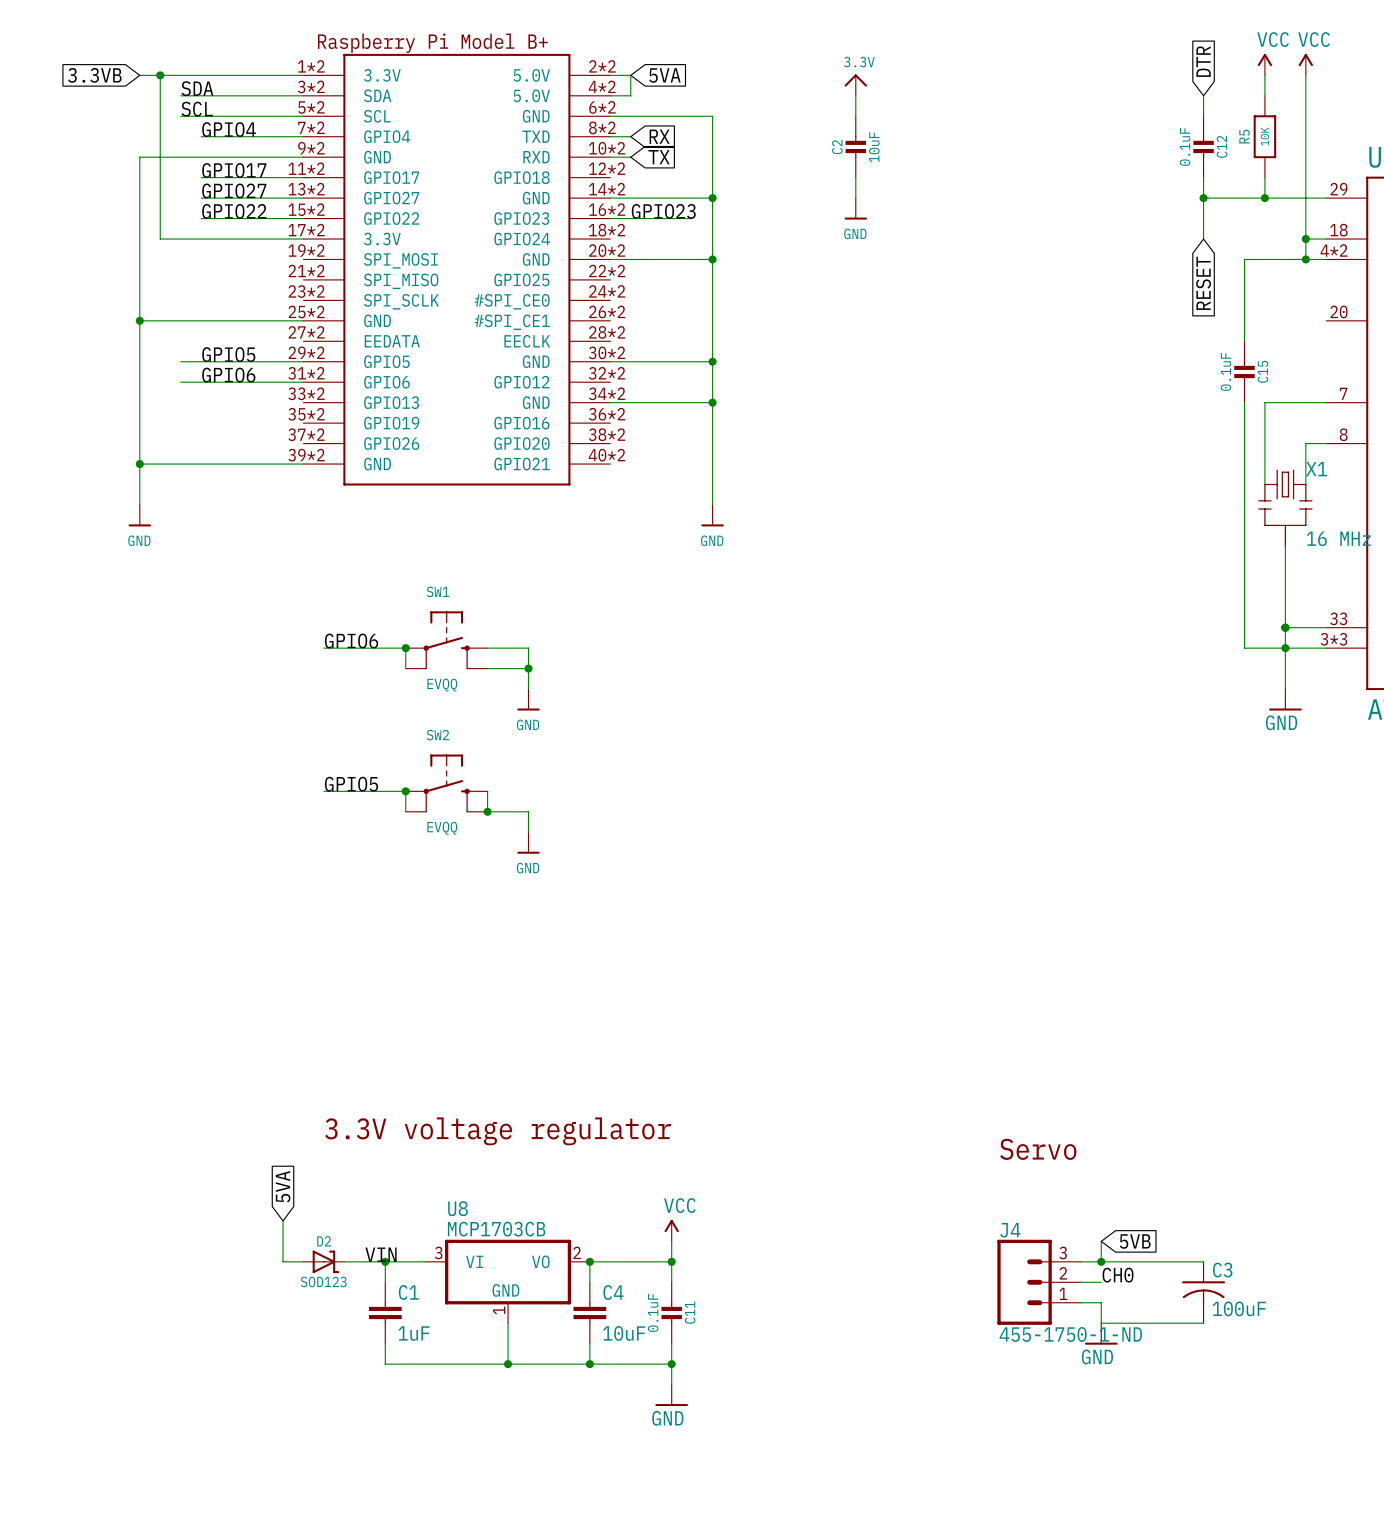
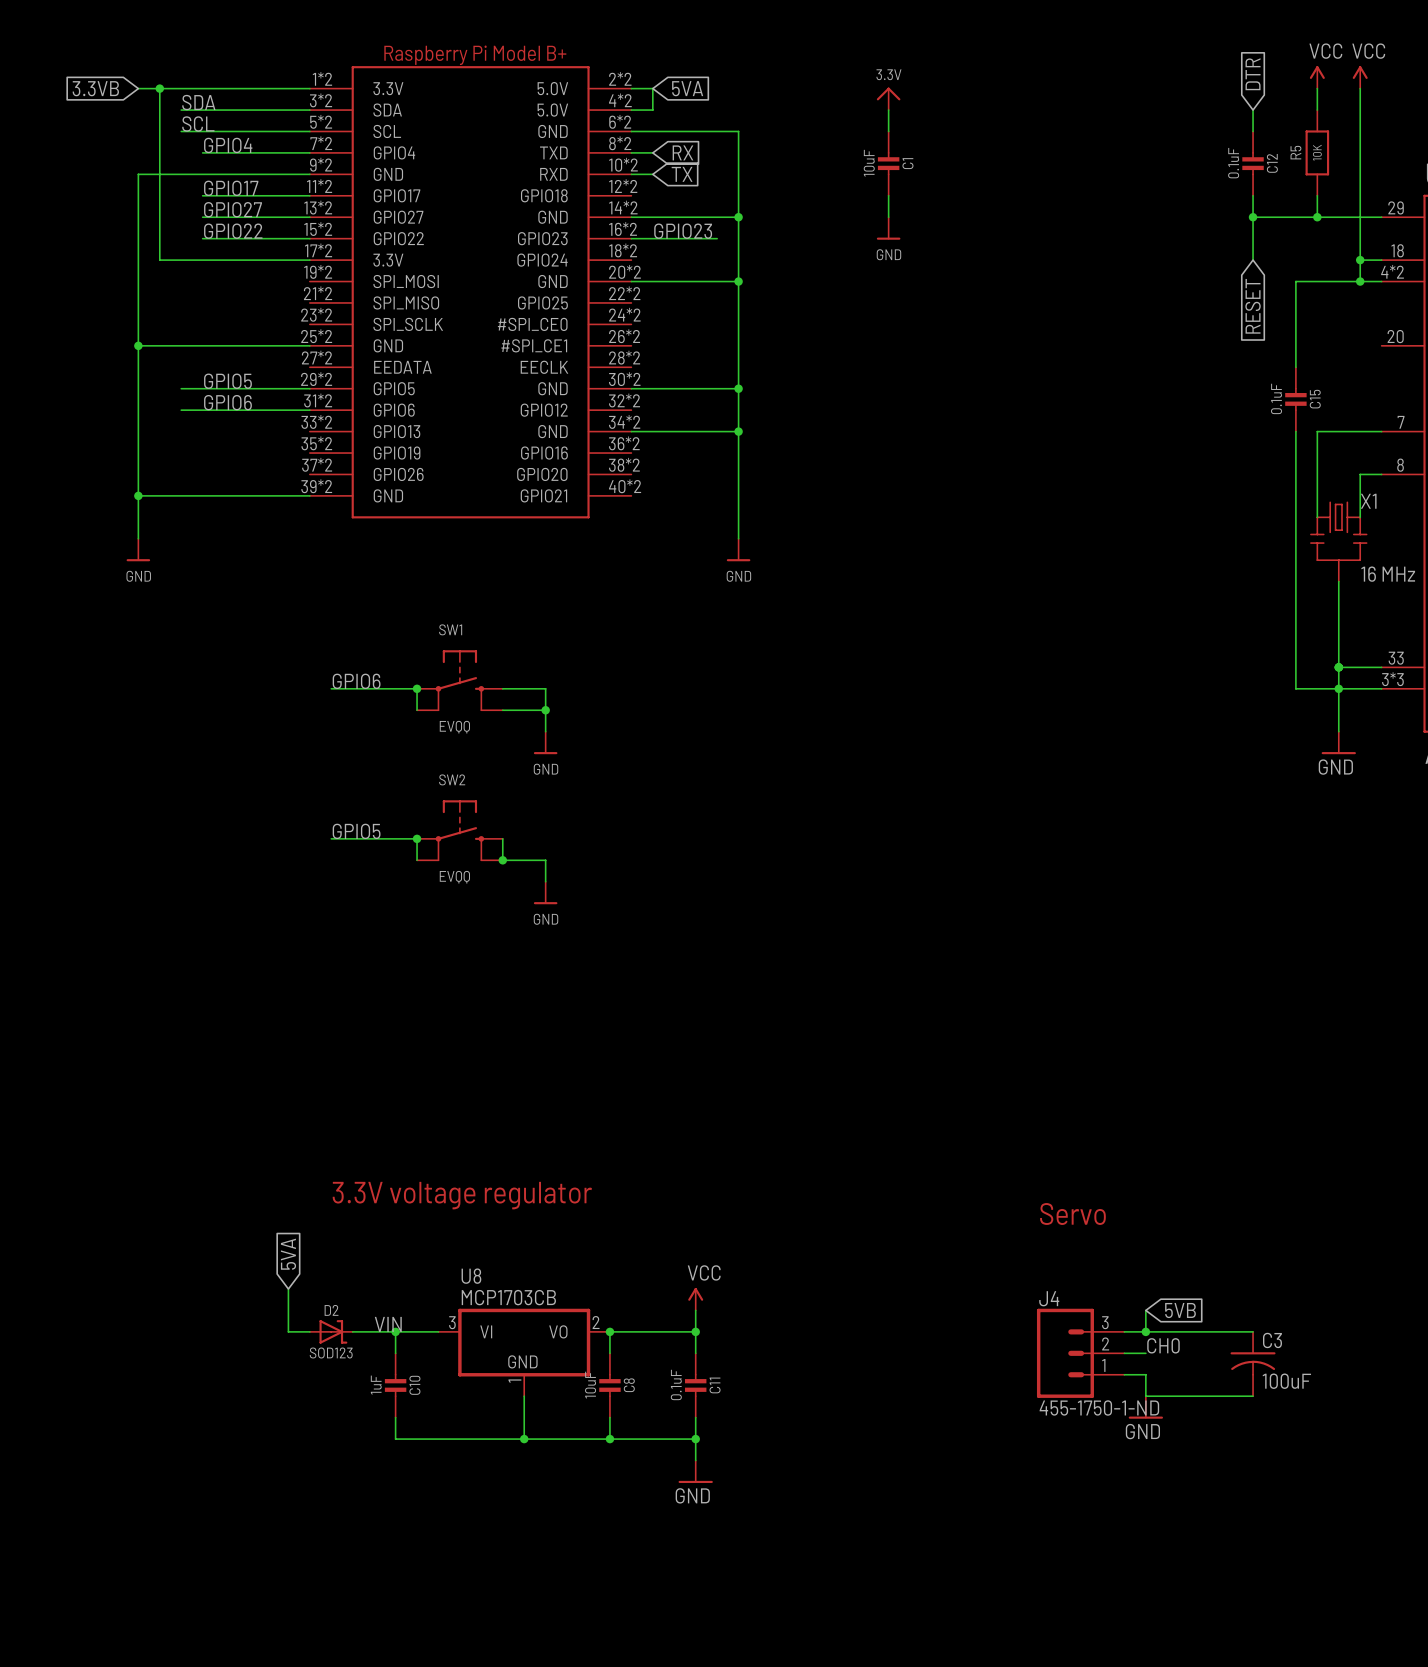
C2 name: C2 (837, 147) -> C1 (907, 163)
C2 value position: 10uF (874, 147) -> 10uF (869, 163)
C1: 1uF (385, 1312) -> none
C10: none -> 1uF (395, 1385)
C4: 10uF (589, 1312) -> none
C8: none -> 10uF (609, 1385)

